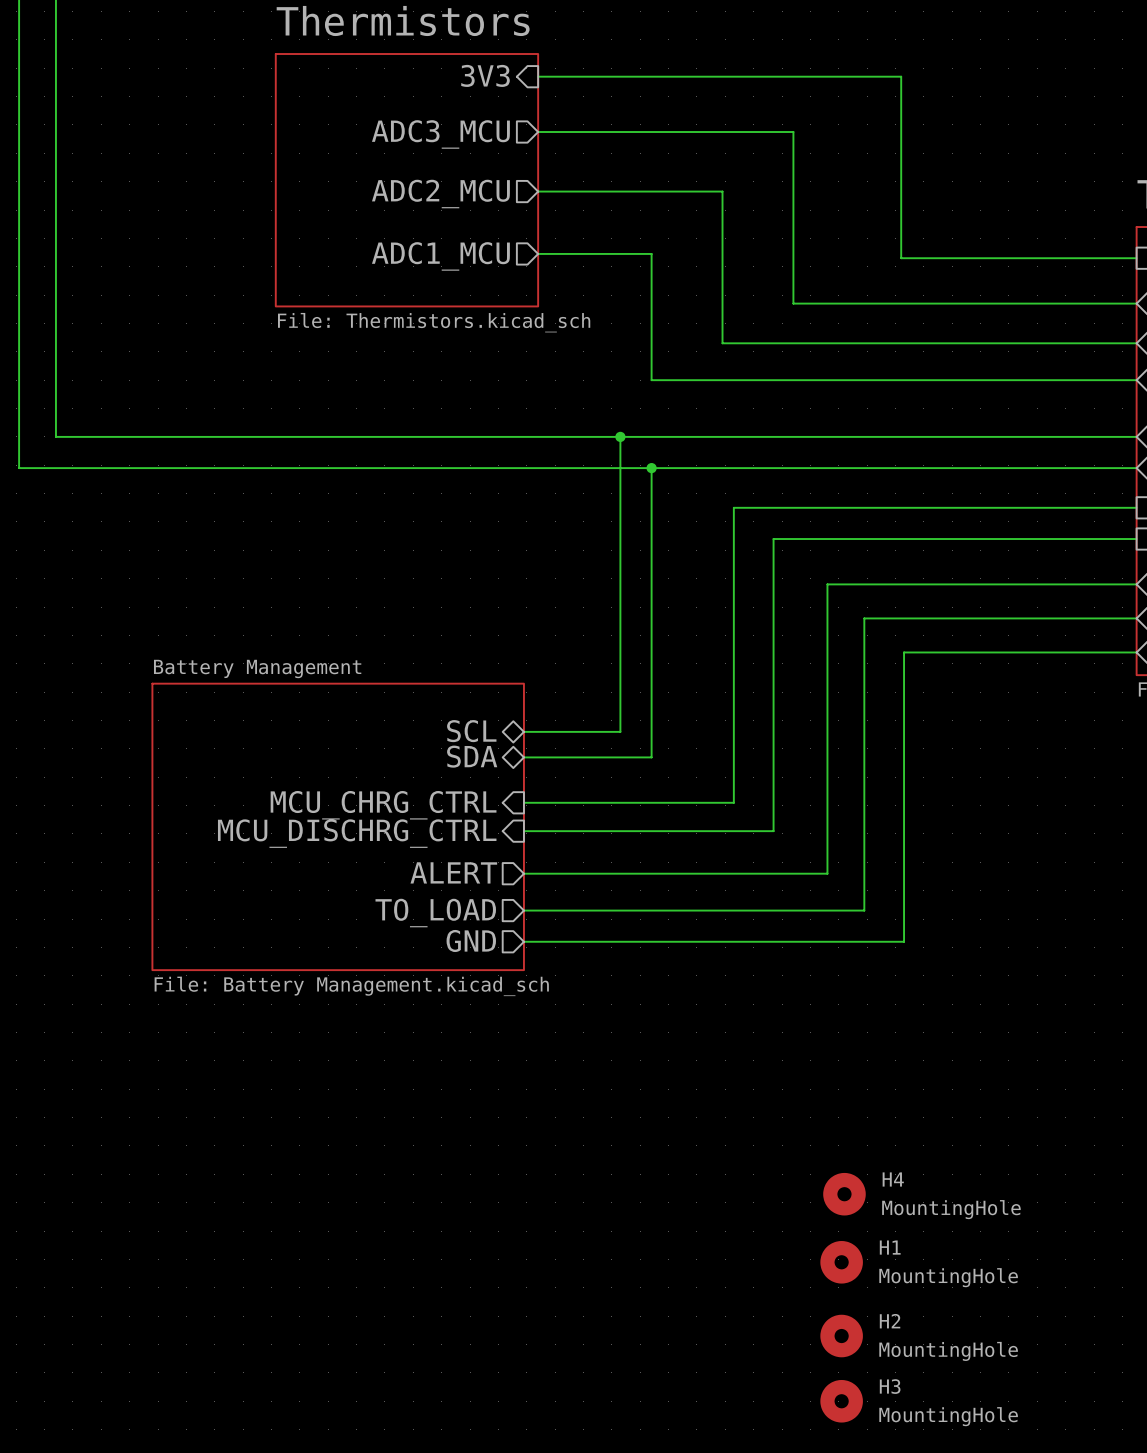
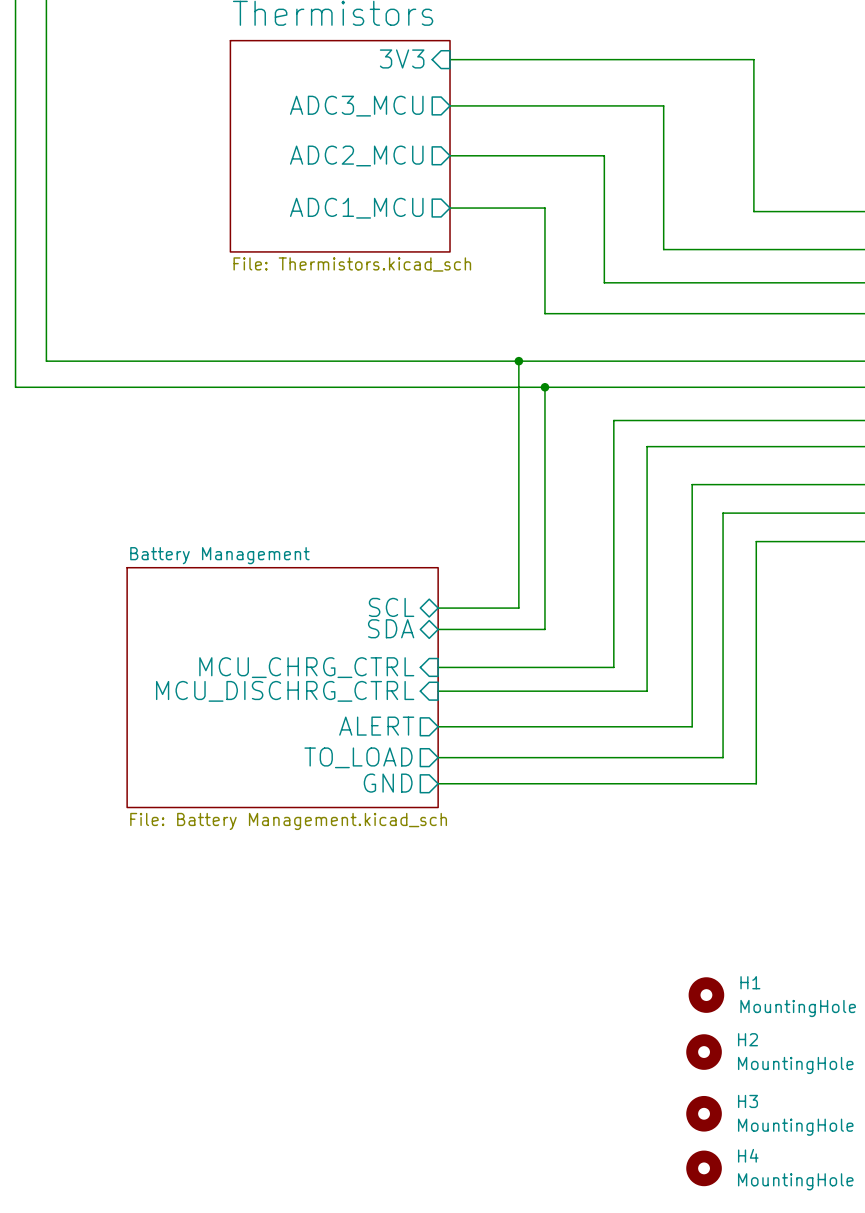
H4 name: H4 (893, 1179) -> H1 (750, 982)
H1 name: H1 (890, 1247) -> H2 (748, 1039)
H2 name: H2 (890, 1321) -> H3 (748, 1101)
H3 name: H3 (890, 1386) -> H4 (748, 1155)

